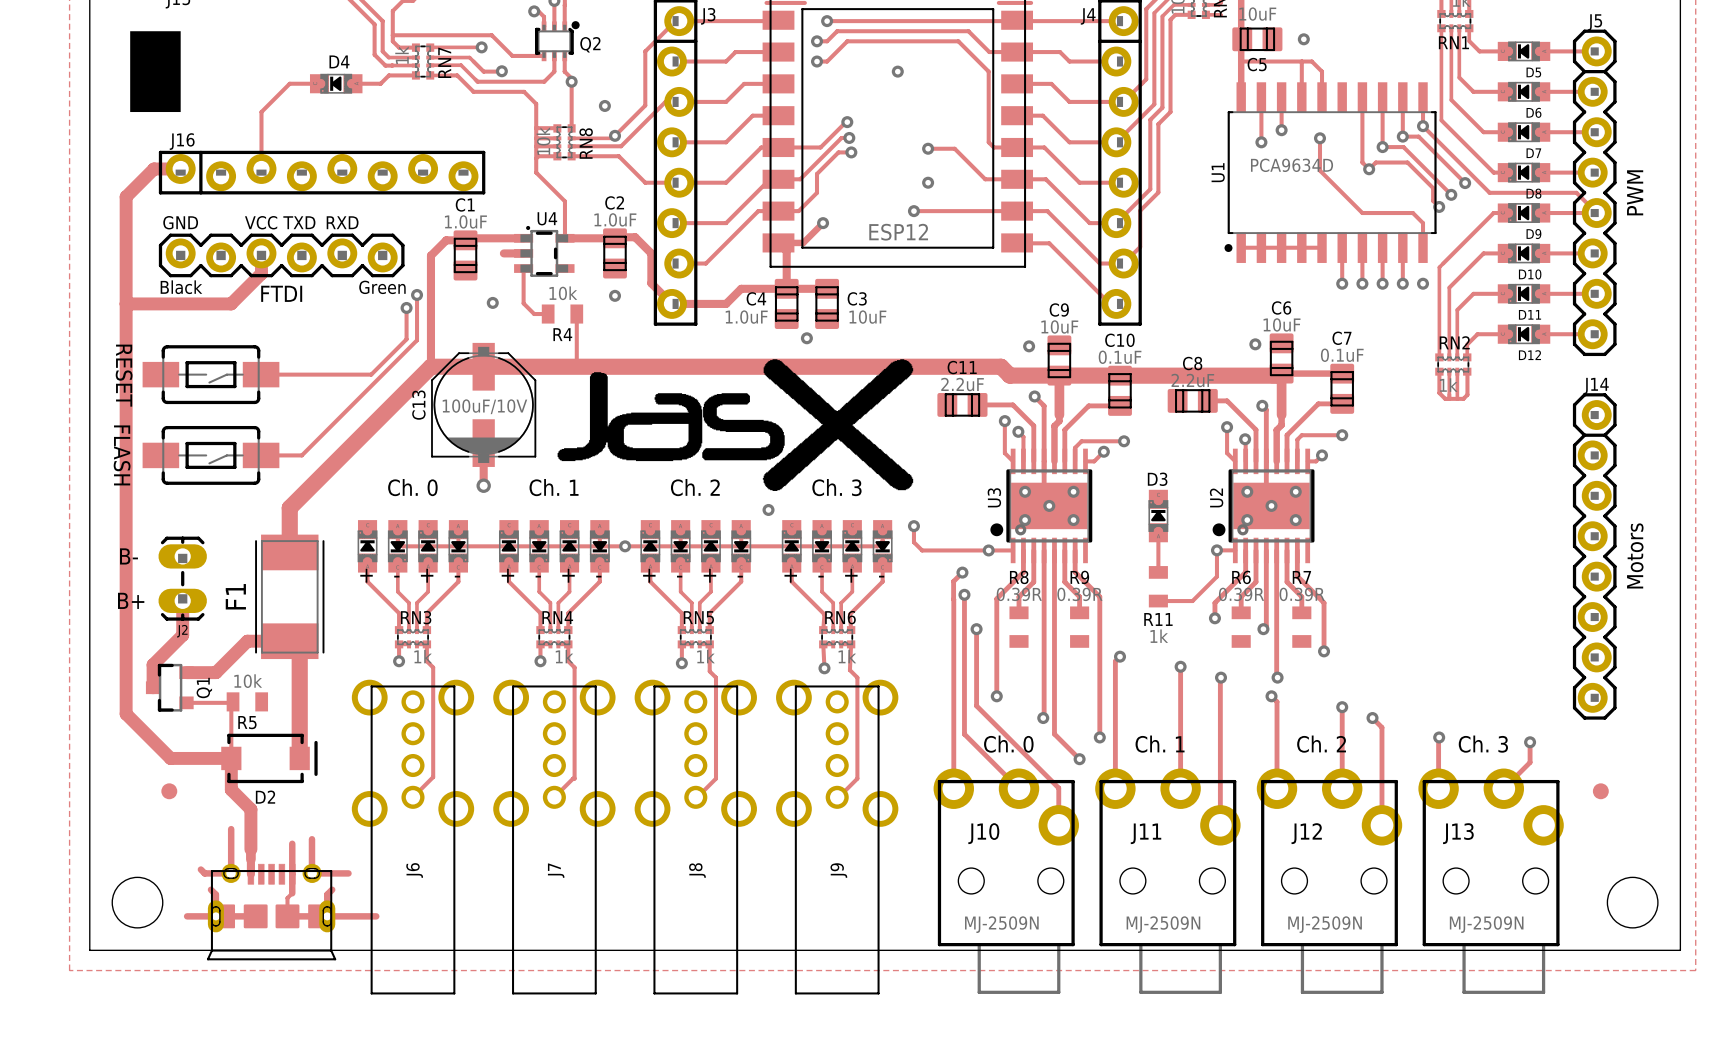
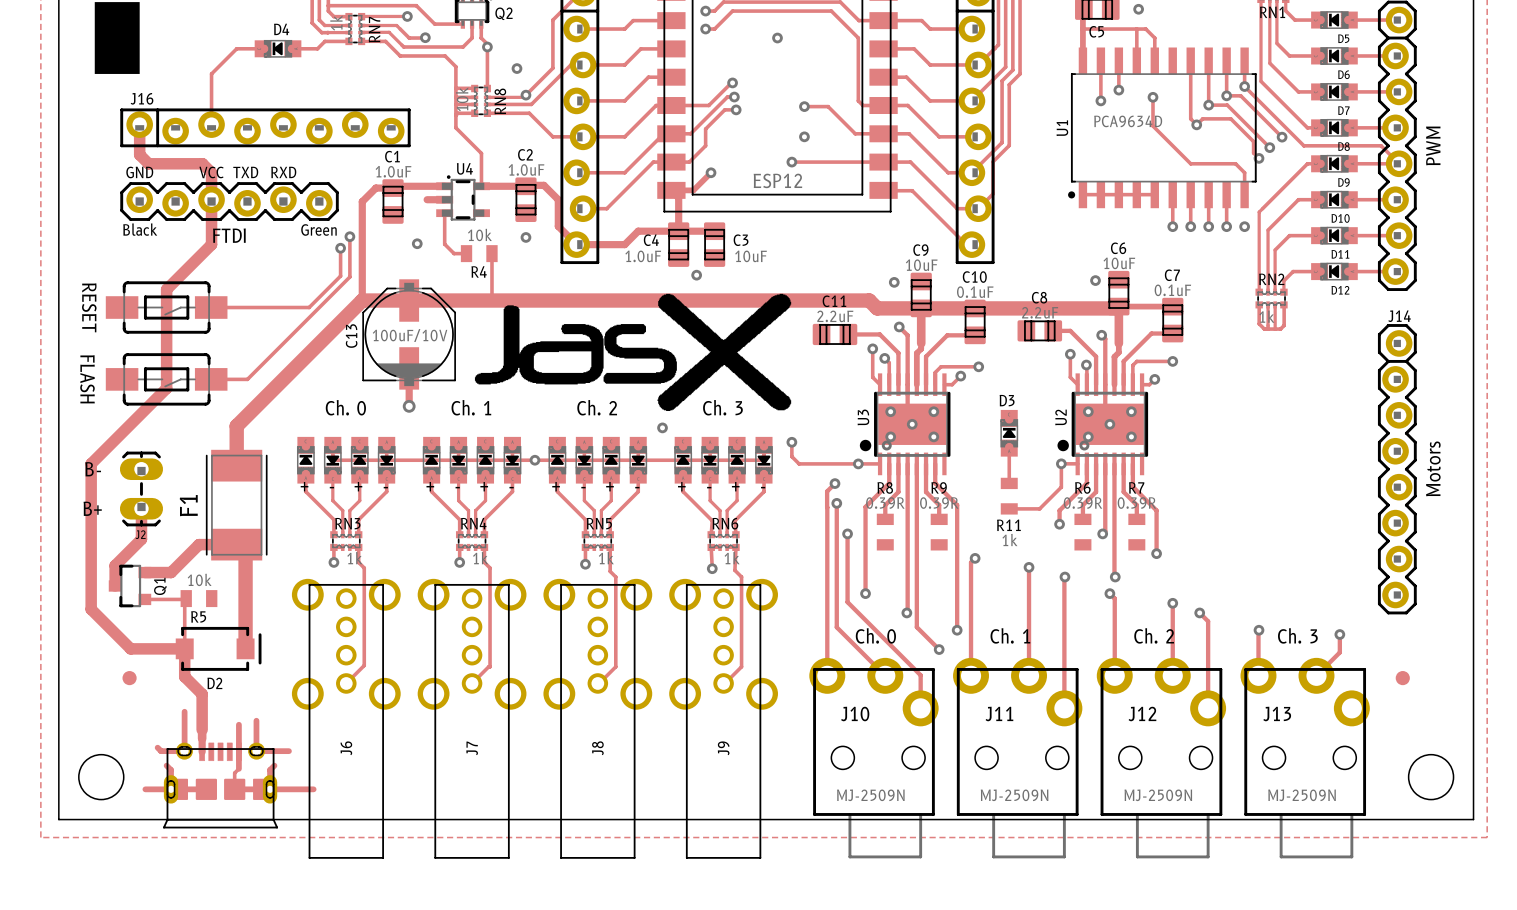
track: (180, 168) (154, 168) (126, 196) (126, 550) -> (211, 217) (211, 244) (166, 289) (166, 388) (91, 463)
track: none -> (139, 124) (139, 154) (148, 163) (202, 163) (211, 172) (211, 199)
track: (261, 273) (231, 303) (126, 303) -> none

